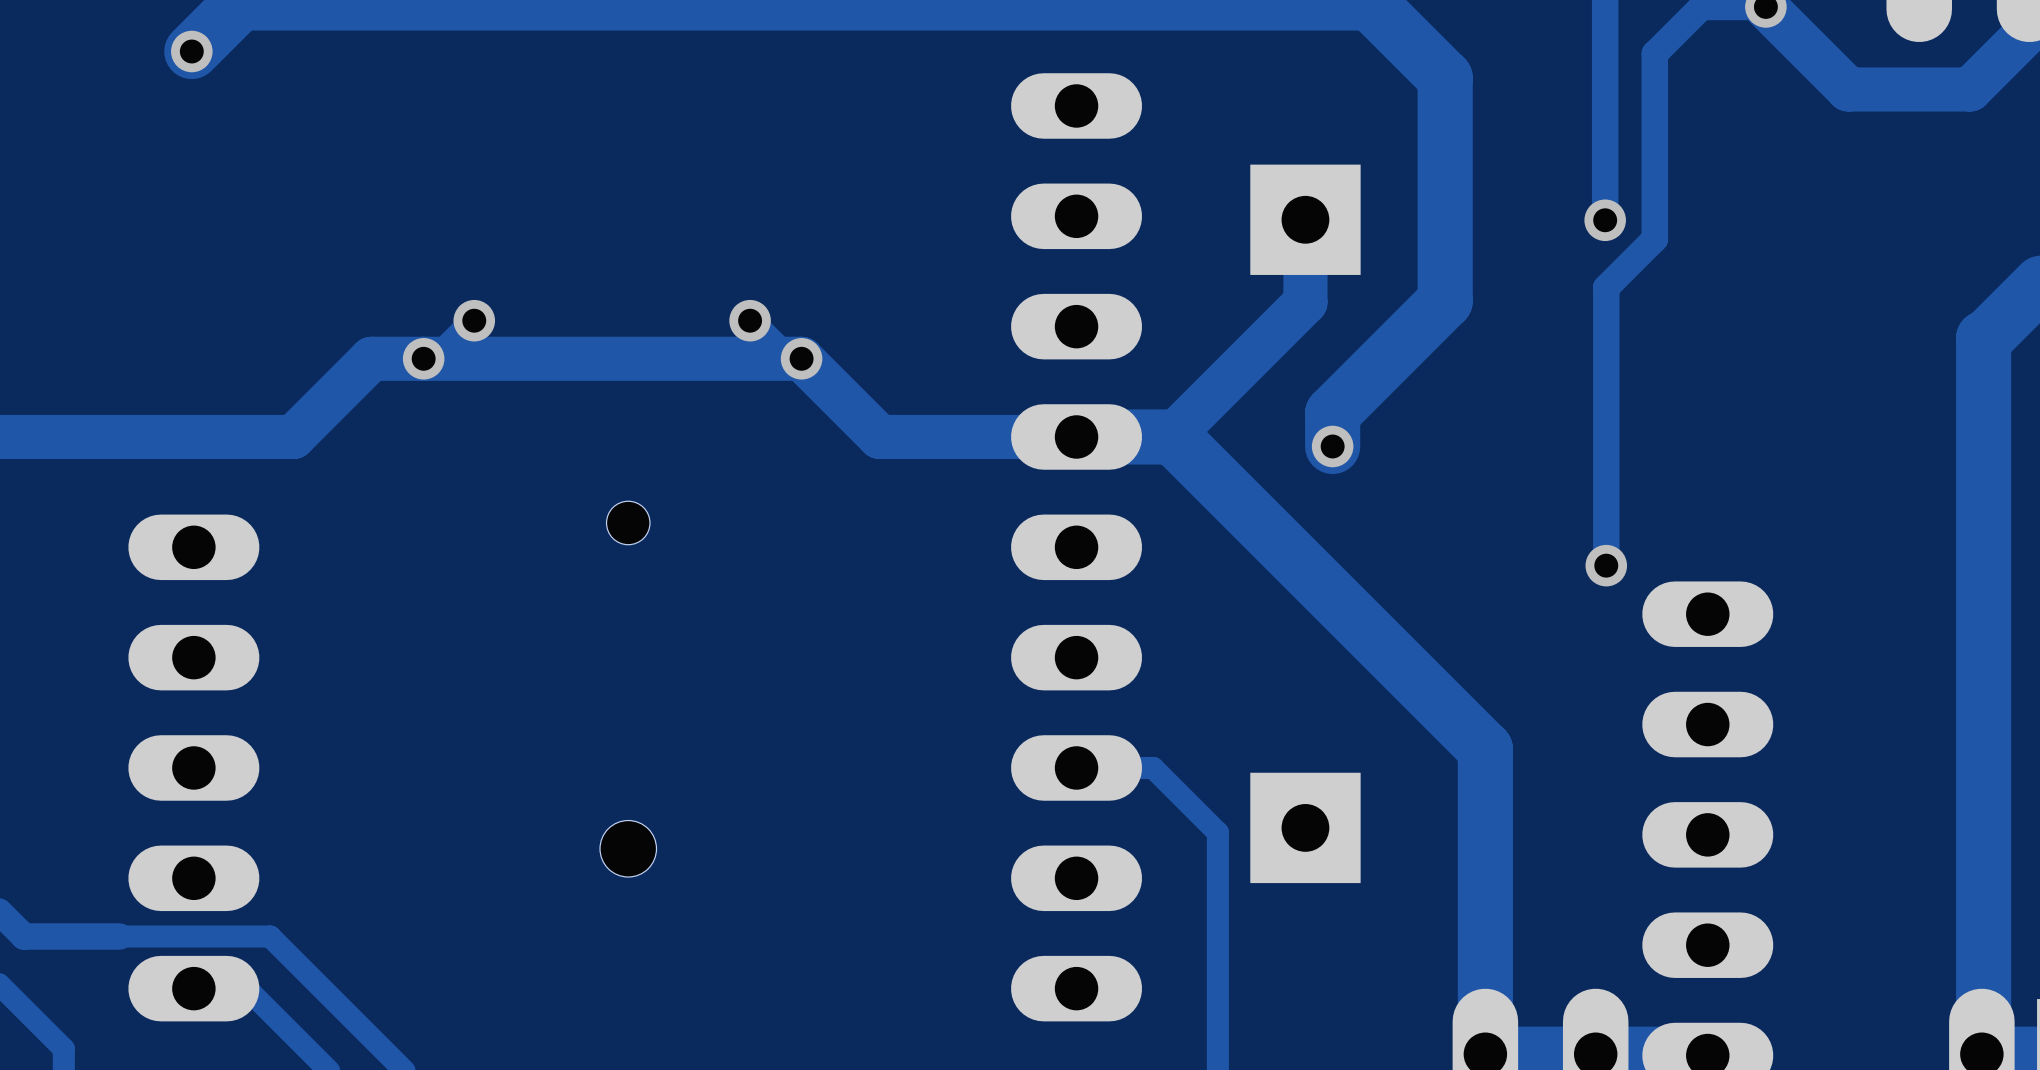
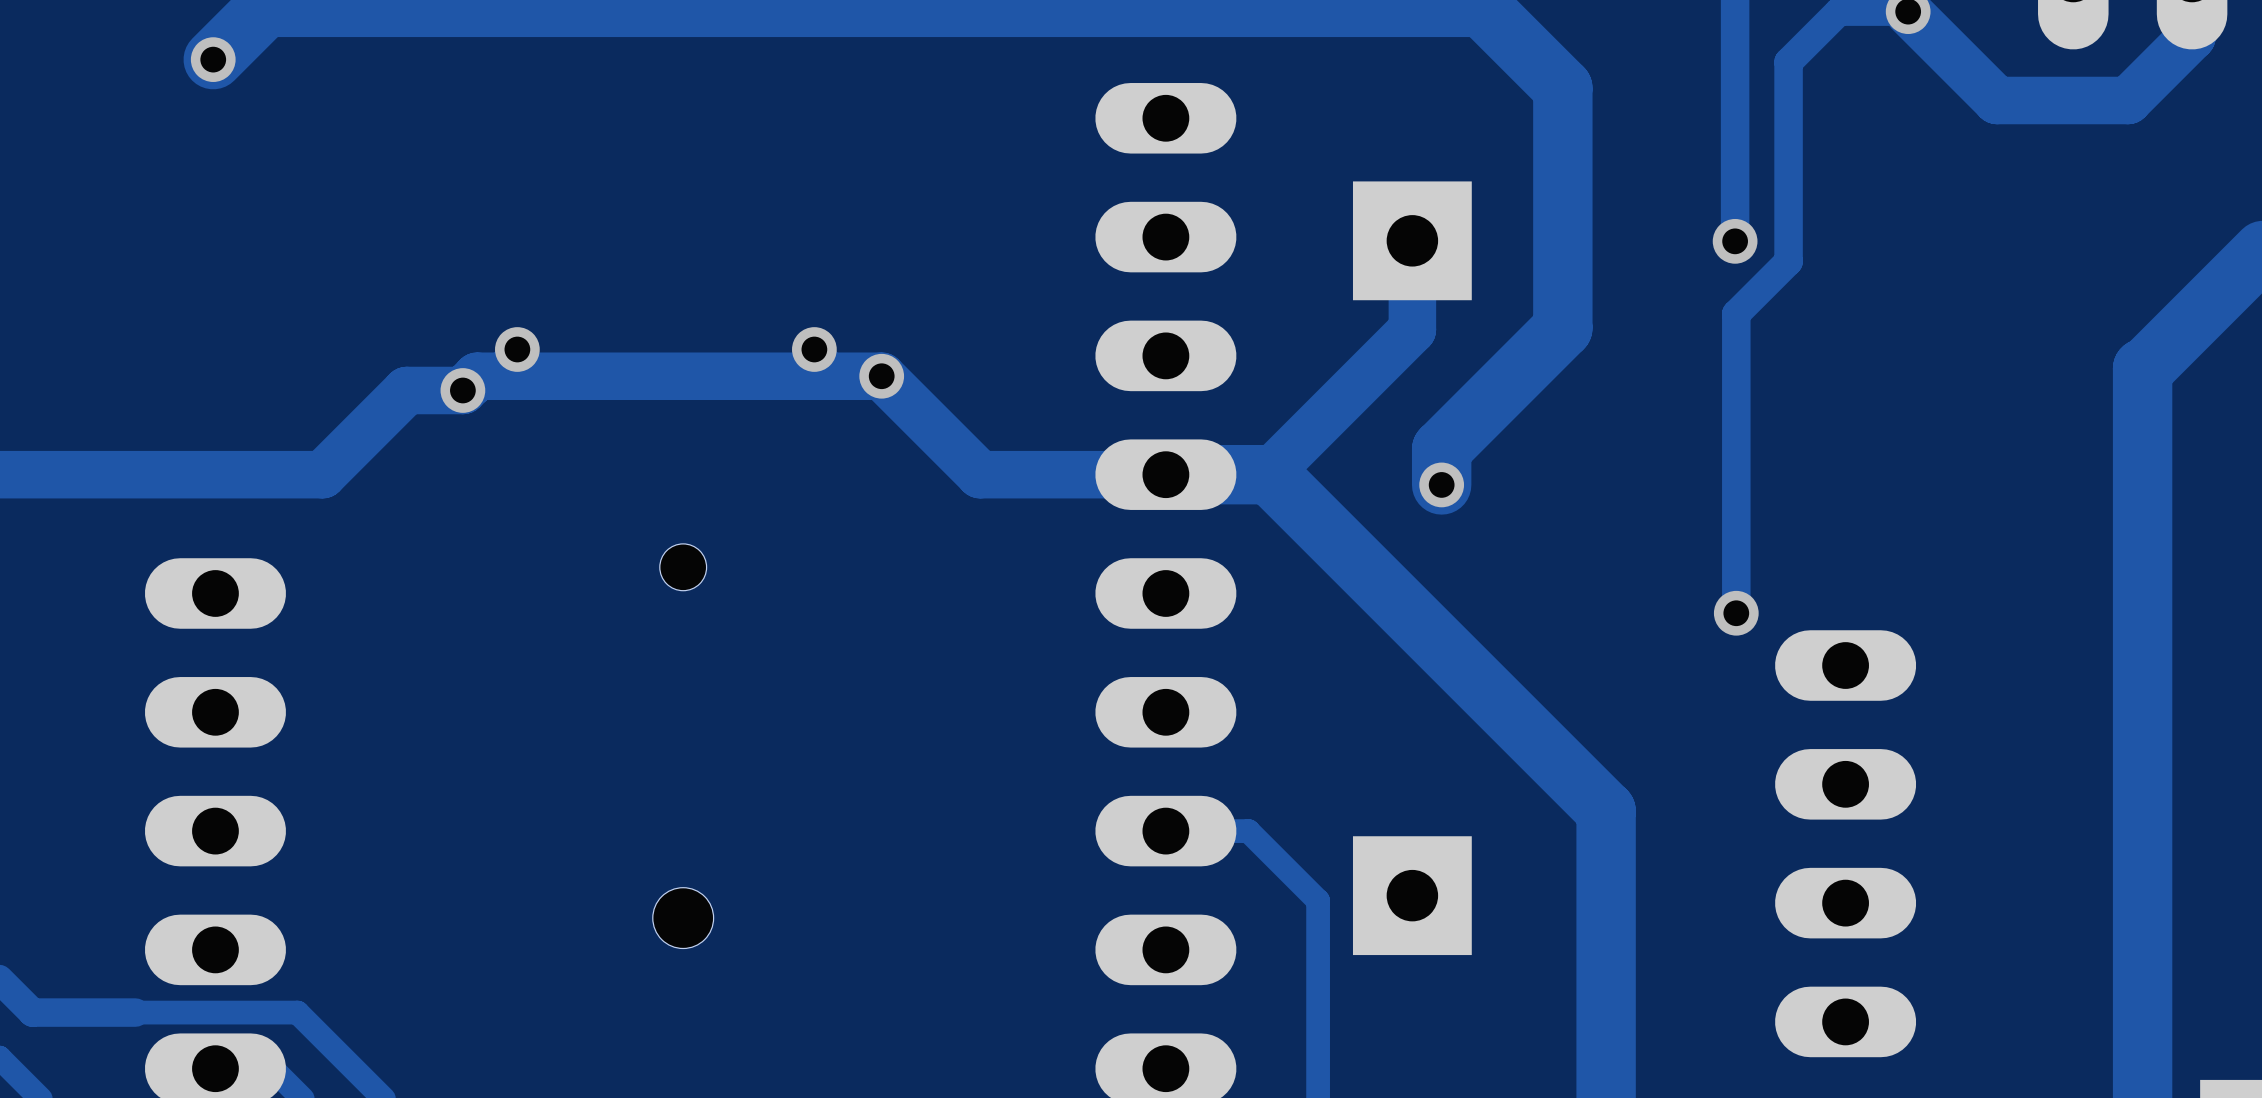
track: (801, 358) (879, 436) (904, 436) -> (881, 376) (980, 474)
track: (801, 358) (423, 358) -> (881, 376) (477, 376) (462, 390)
via position: (801, 358) -> (881, 376)

